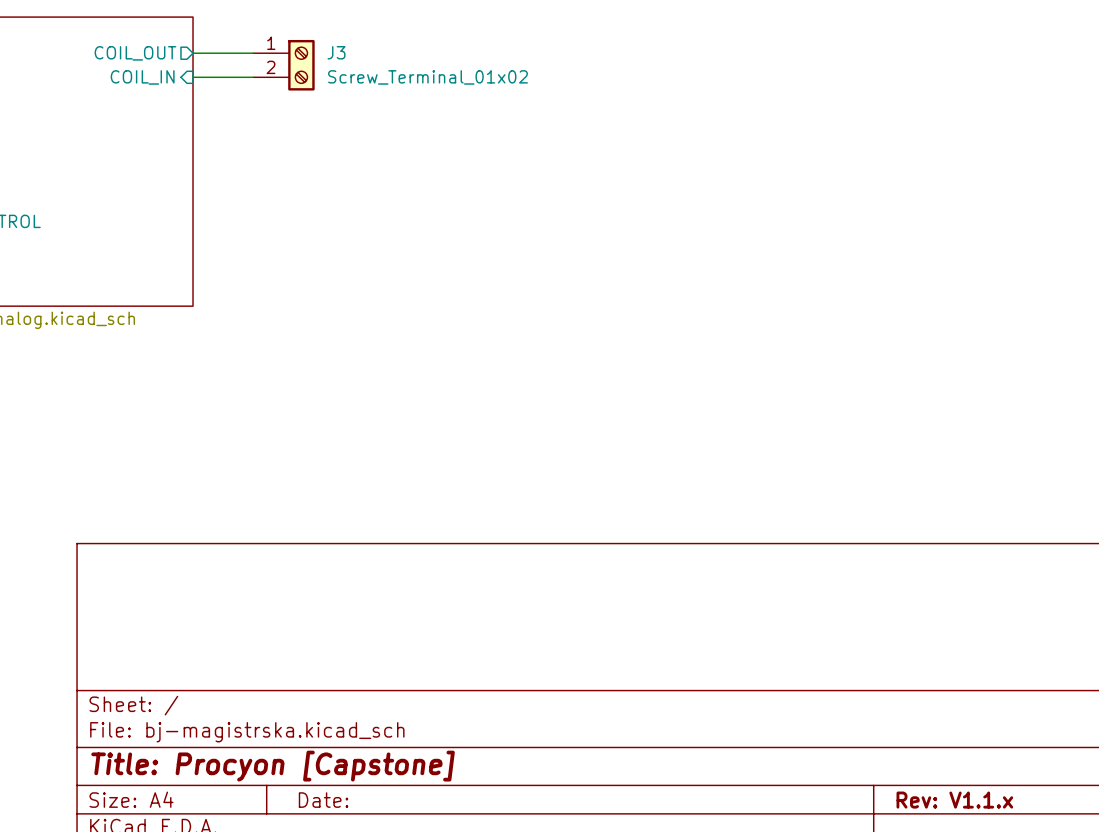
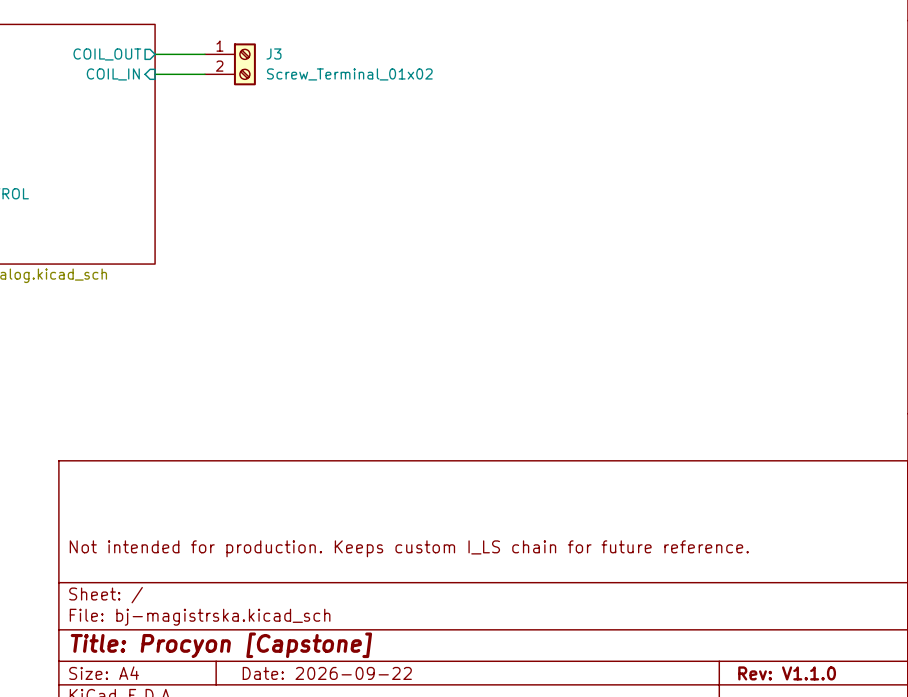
title block: none -> Not intended for production. Keeps custom I_LS chain for future reference. (409, 548)
title block: Date: (323, 800) -> Date: 2026-09-22 (327, 673)
title block: Rev: V1.1.x (954, 800) -> Rev: V1.1.0 (787, 673)

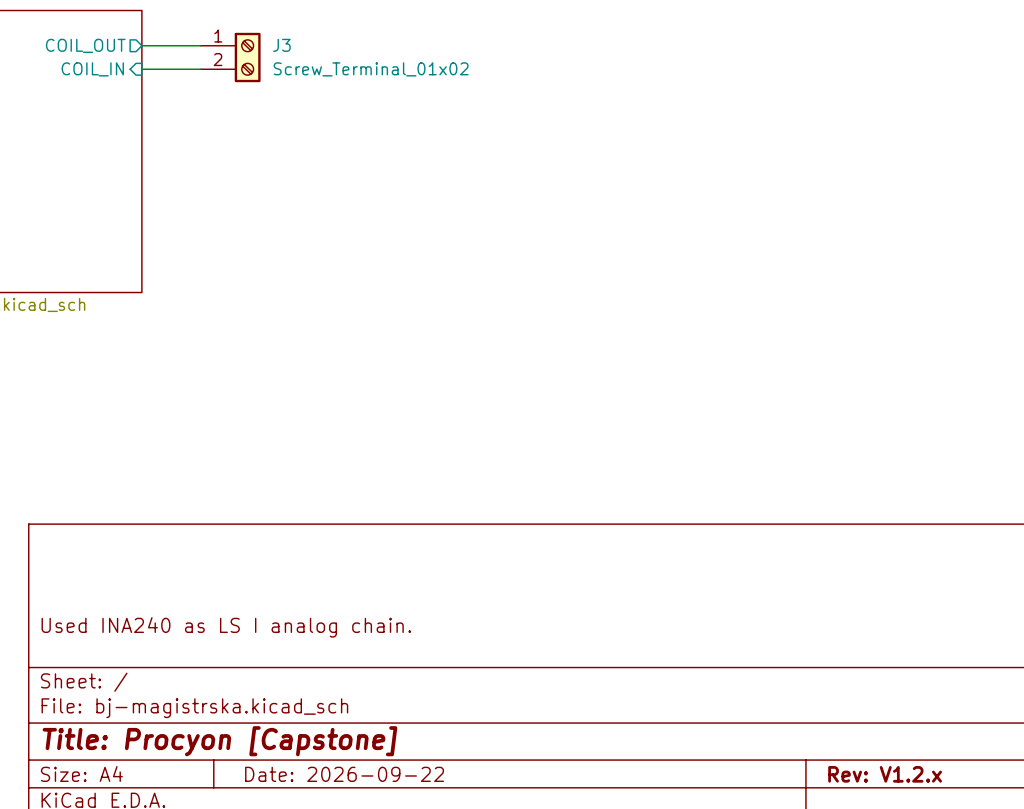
title block: Not intended for production. Keeps custom I_LS chain for future reference. (409, 548) -> Used INA240 as LS I analog chain. (226, 627)
title block: Rev: V1.1.0 (787, 673) -> Rev: V1.2.x (885, 774)

